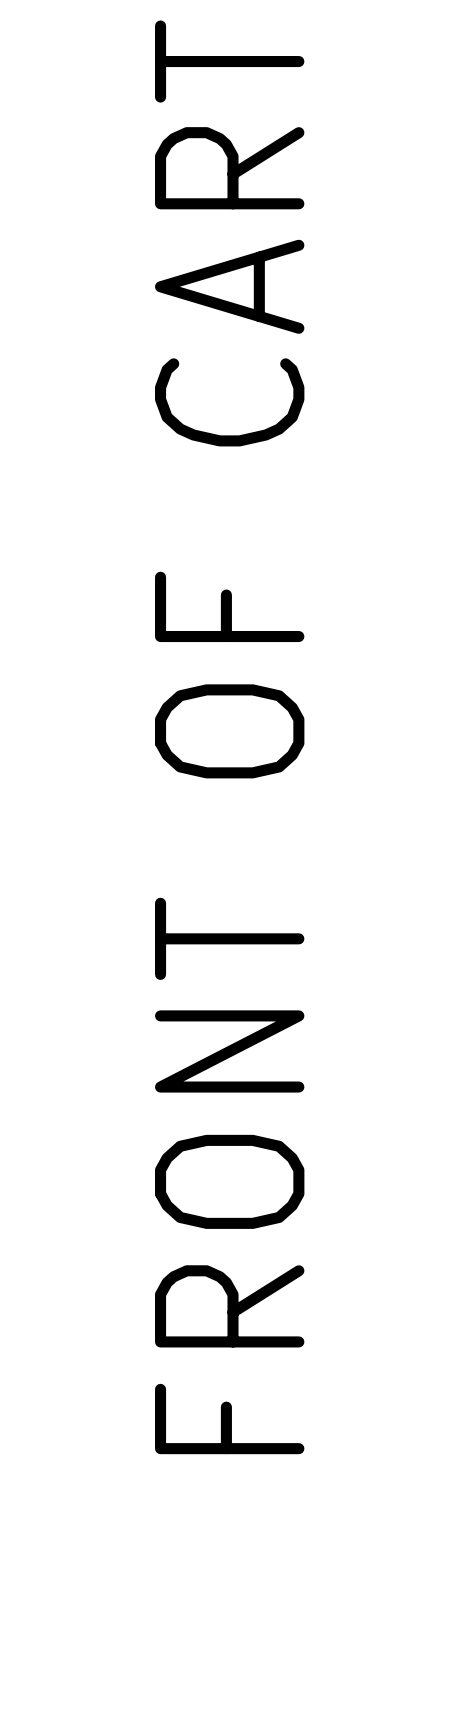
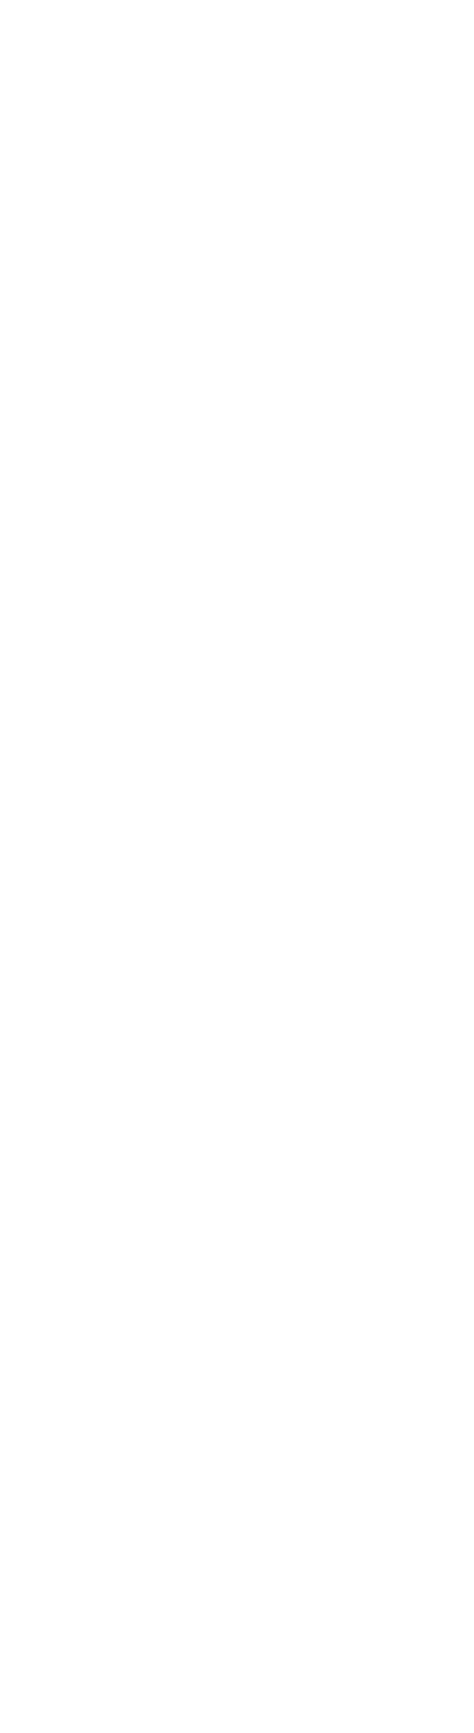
text: FRONT OF CART (229, 737) -> none

